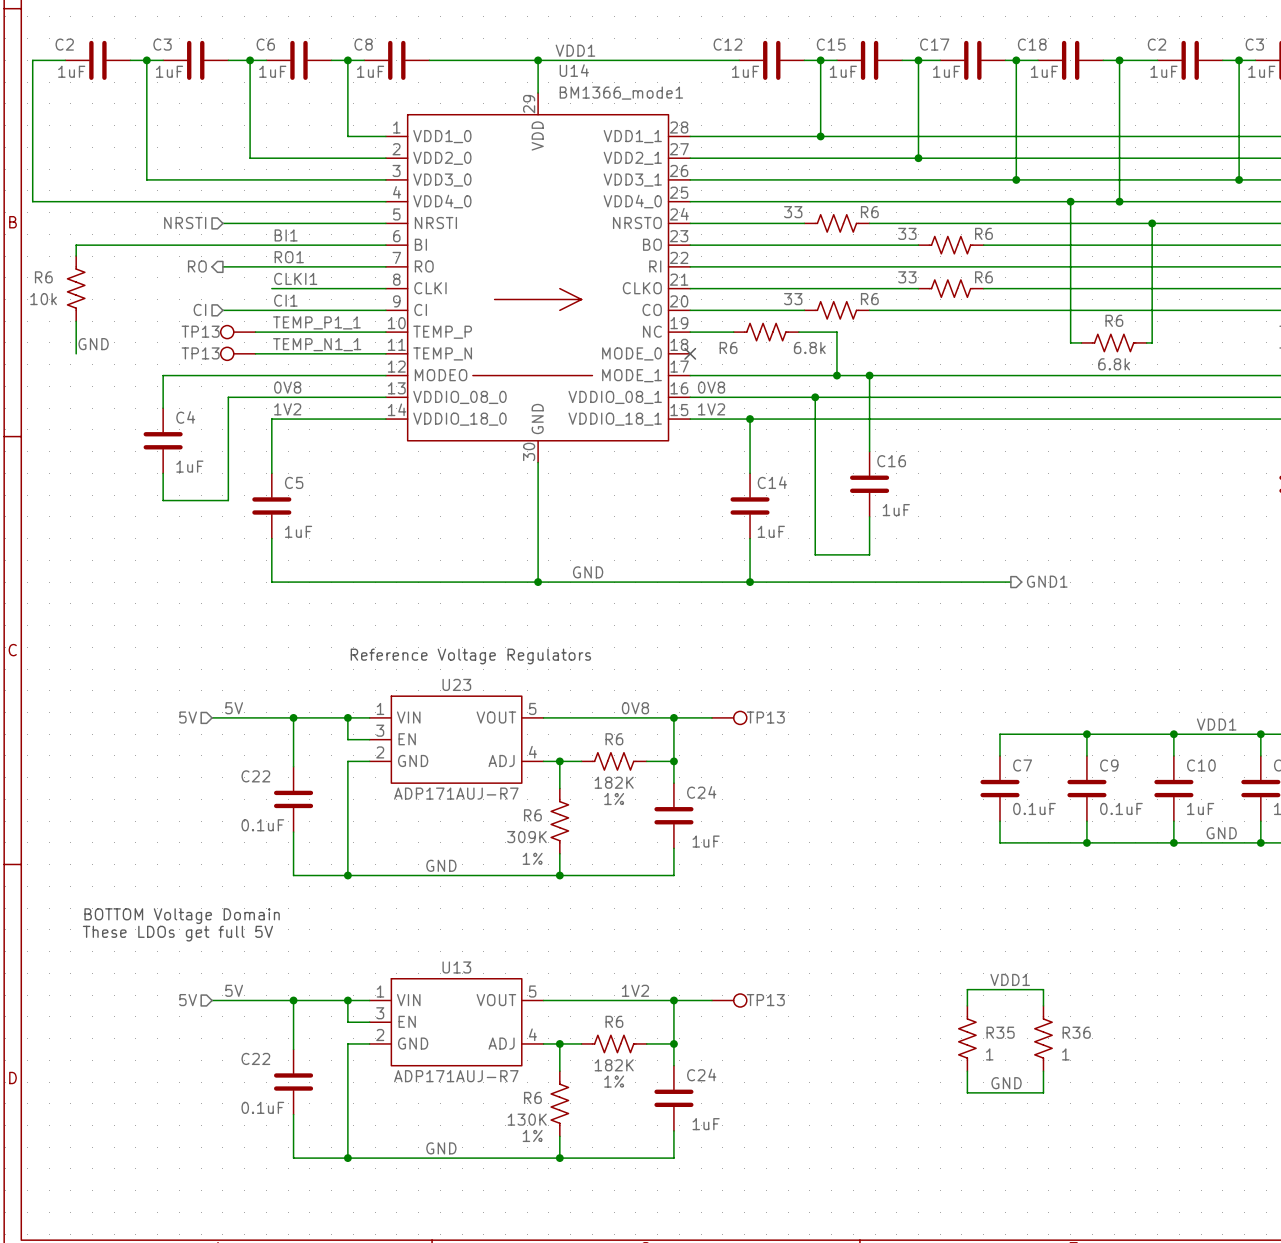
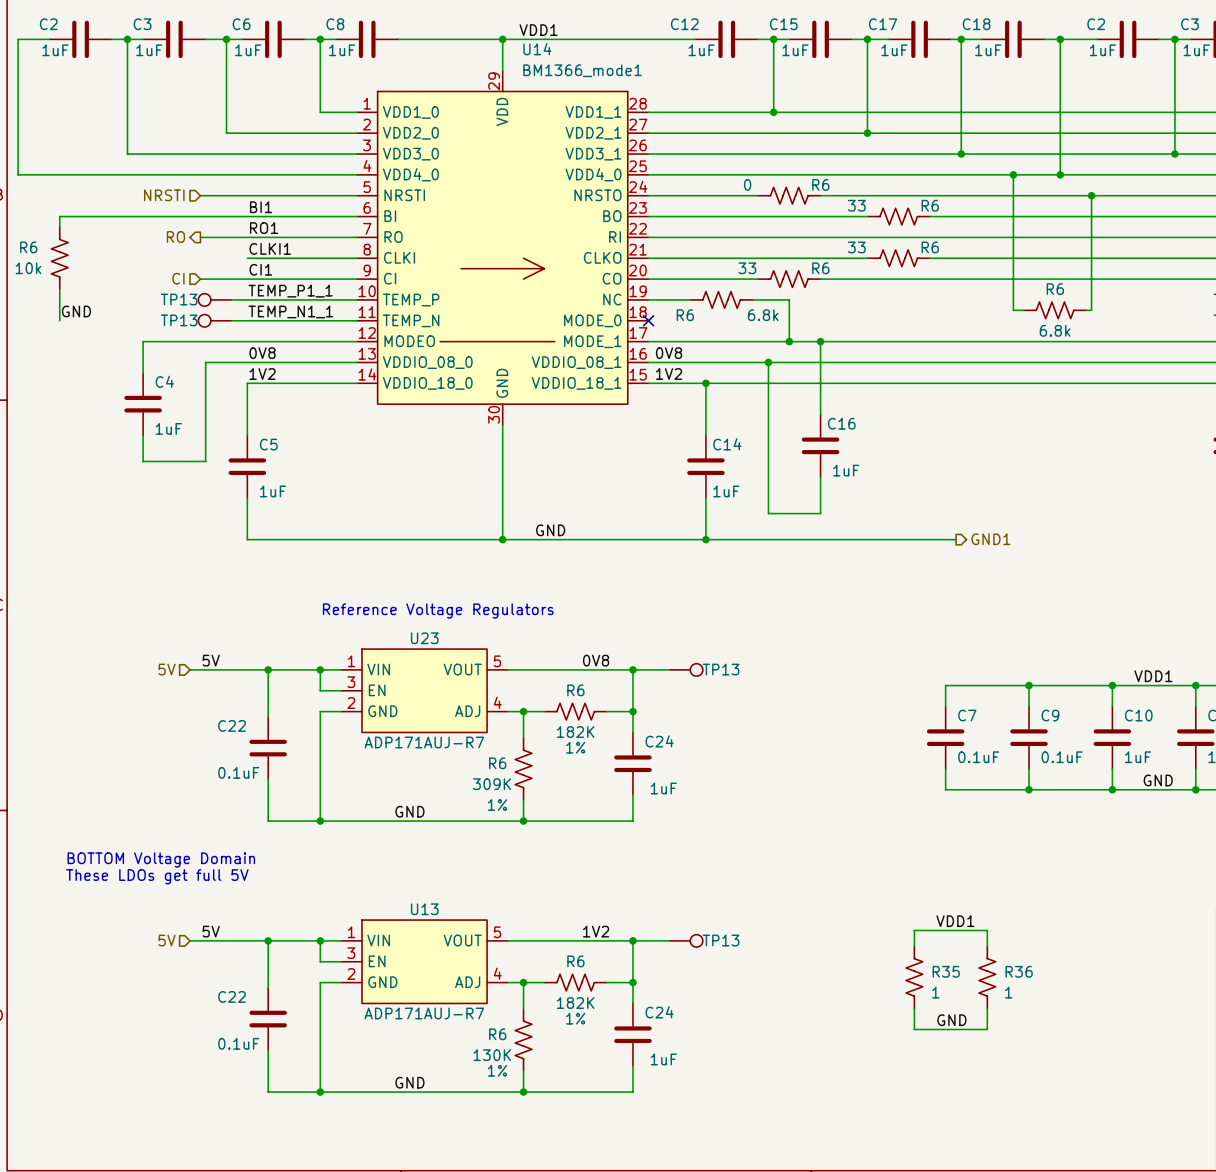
R6 value: 33 (793, 212) -> 0 (747, 184)

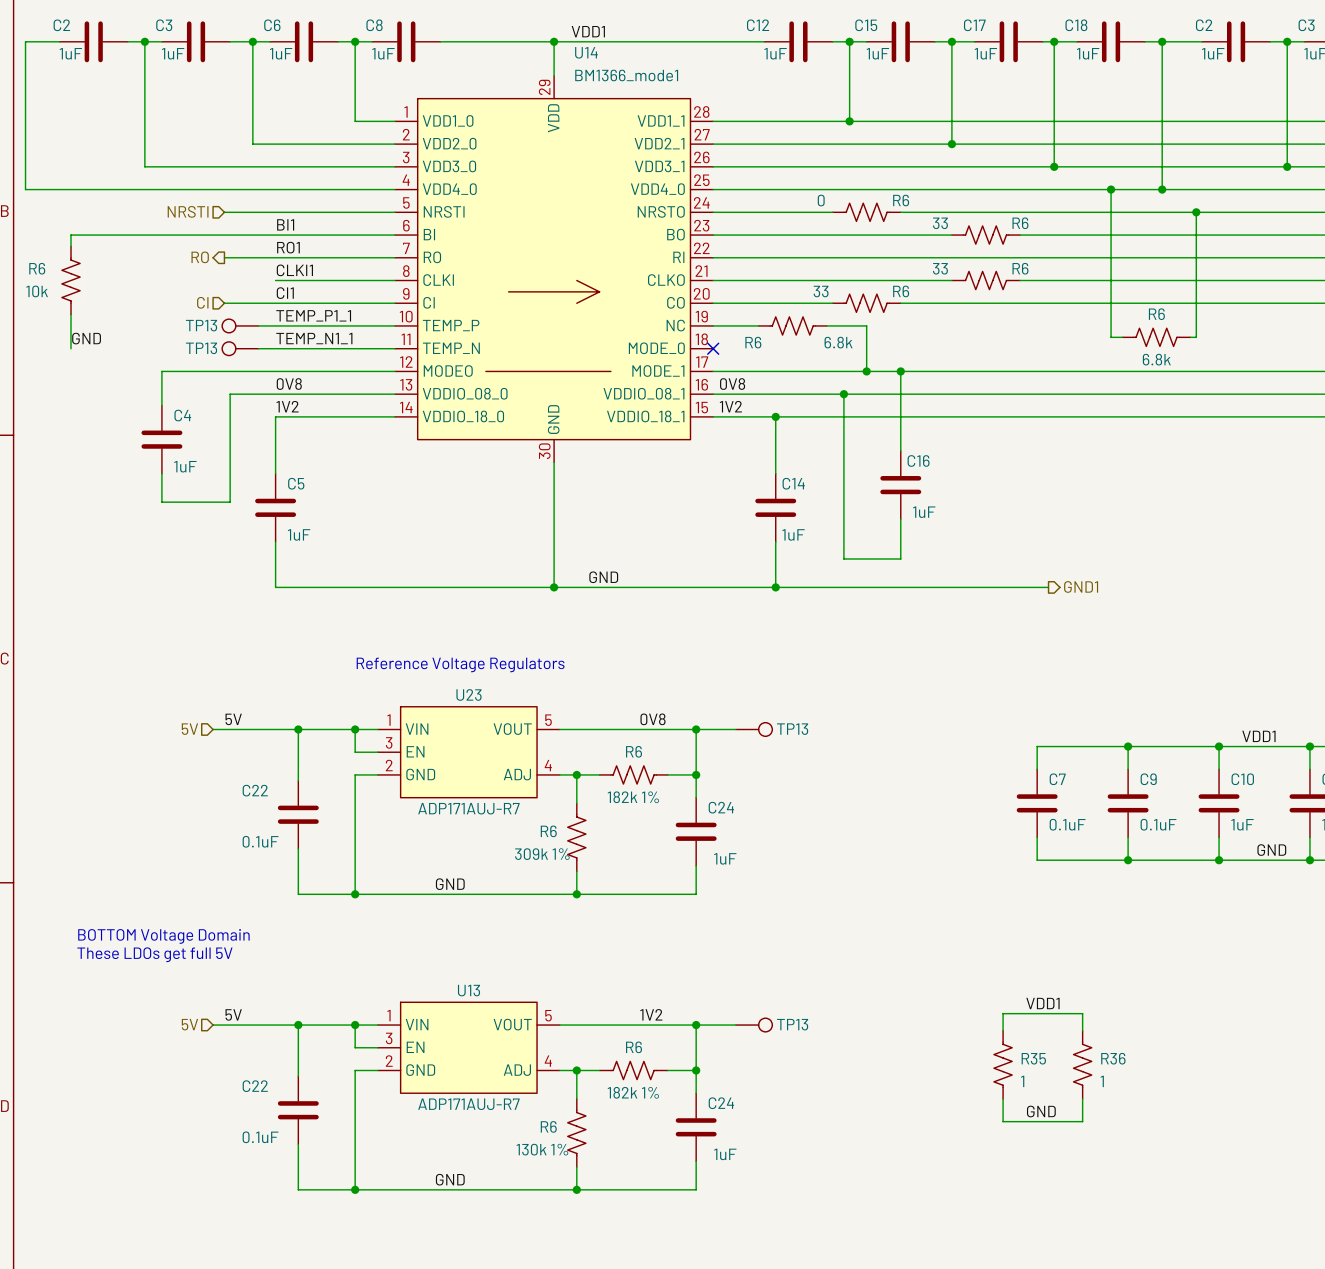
R6 value: 182K (575, 732) -> 182k 1% (633, 797)
R6 text: 1% (575, 747) -> none
R6 value: 309K (492, 784) -> 309k 1% (542, 854)
R6 text: 1% (497, 805) -> none
R6 value: 182K (575, 1003) -> 182k 1% (633, 1092)
R6 text: 1% (575, 1018) -> none
R6 value: 130K (492, 1055) -> 130k 1% (542, 1149)
R6 text: 1% (497, 1070) -> none

